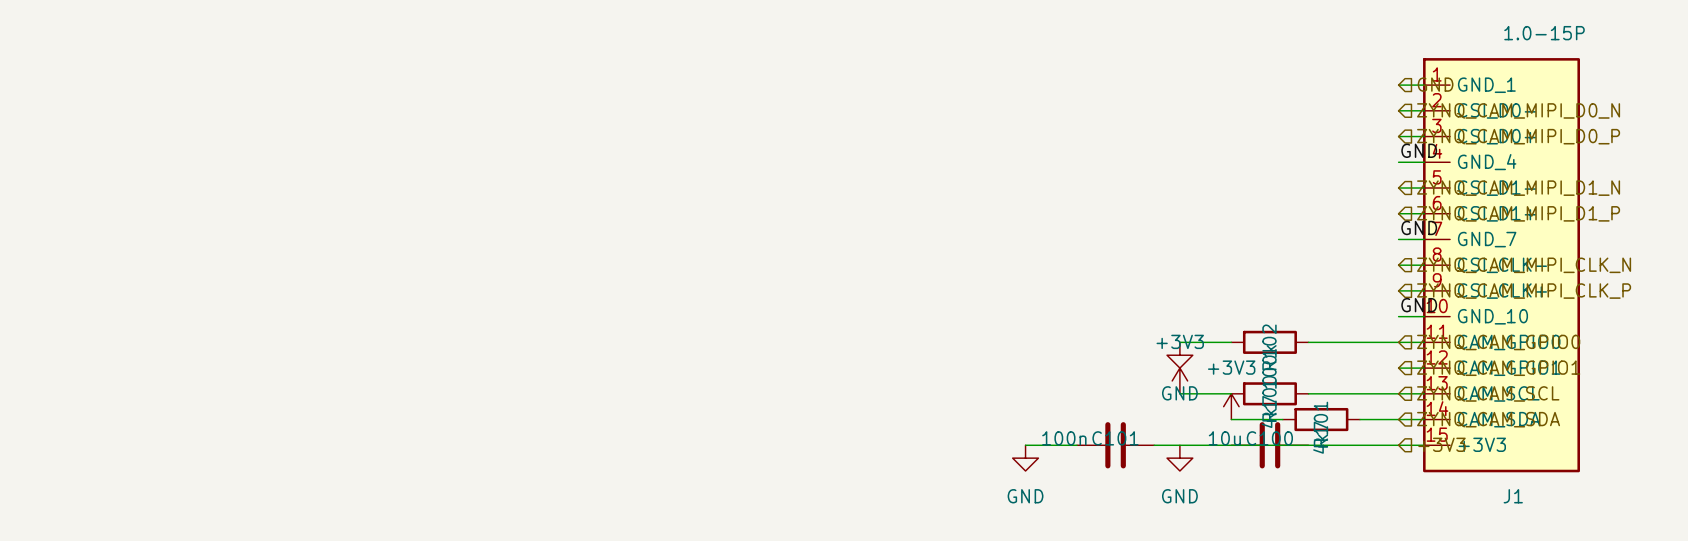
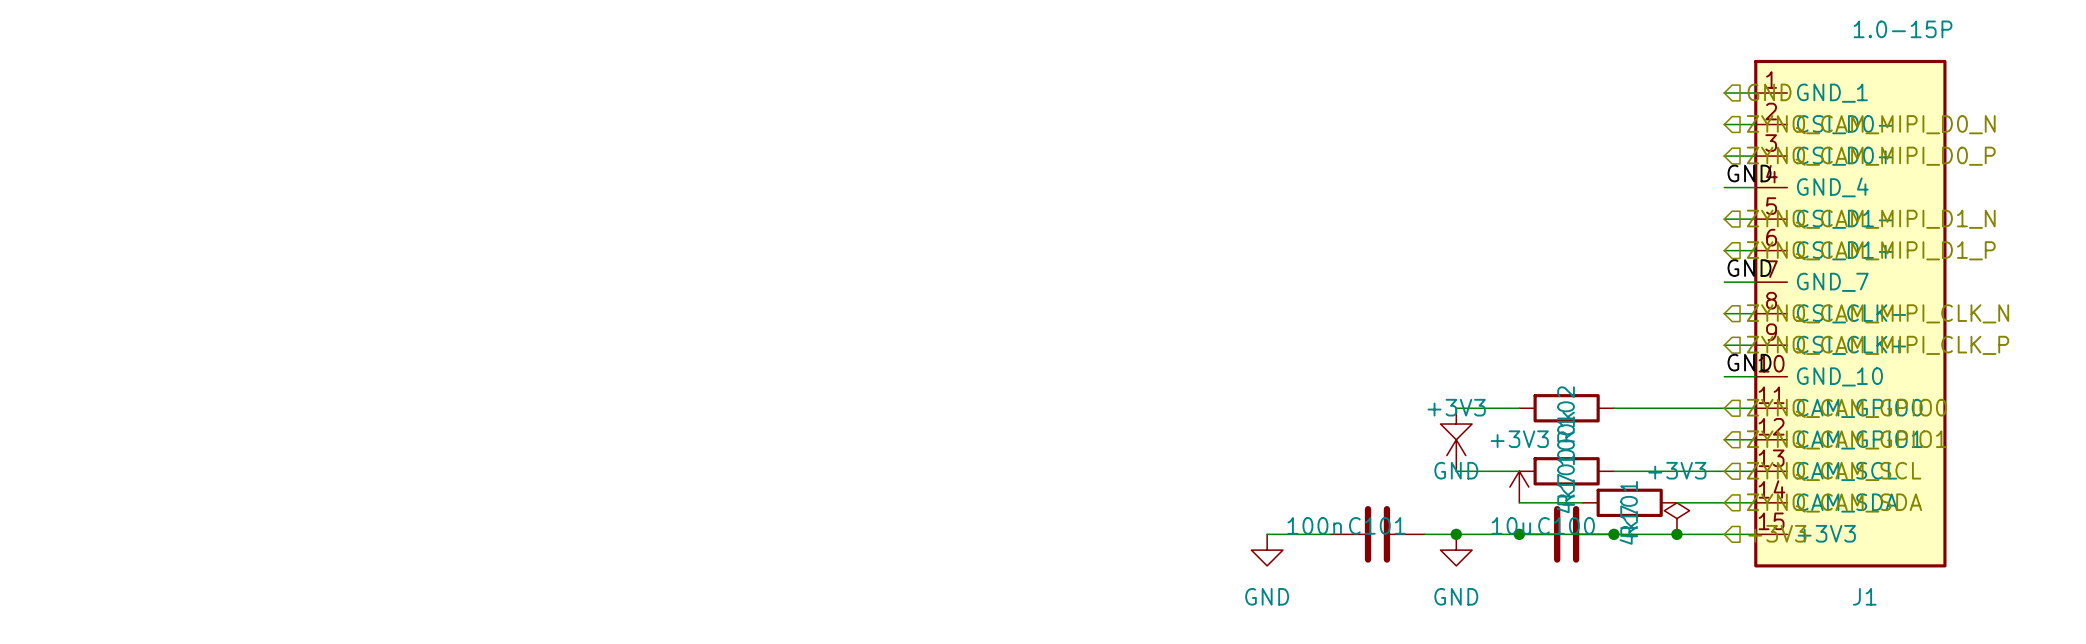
power symbol: none -> +3V3 (1676, 518)
junction: none -> (1456, 534)
junction: none -> (1519, 534)
junction: none -> (1613, 534)
junction: none -> (1676, 534)

